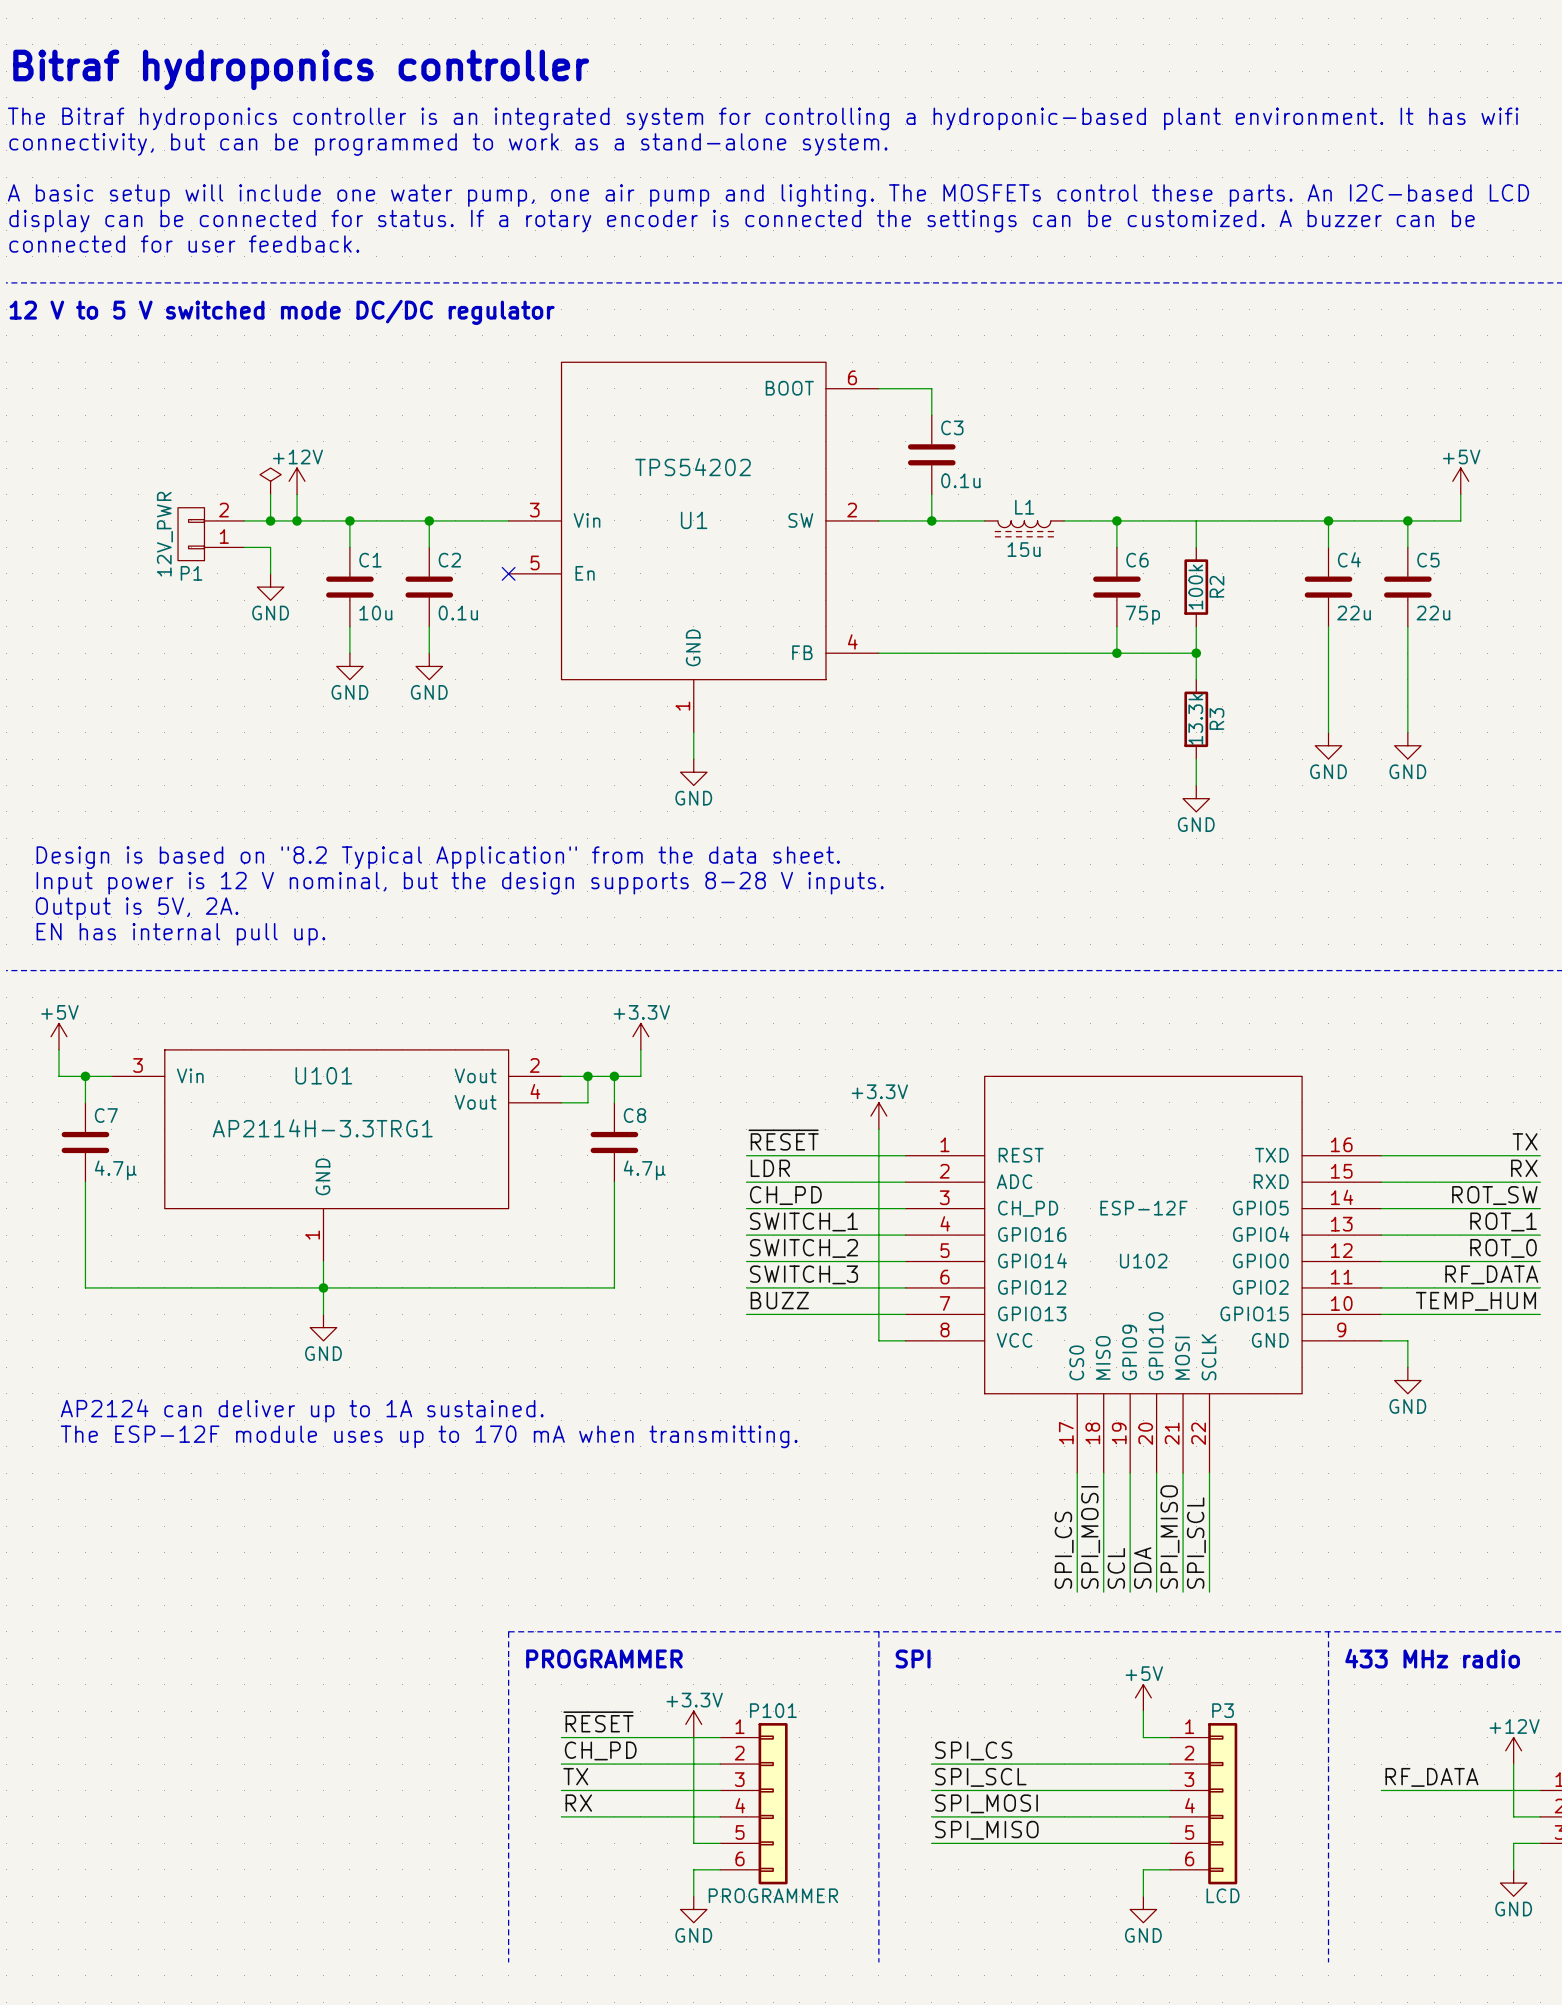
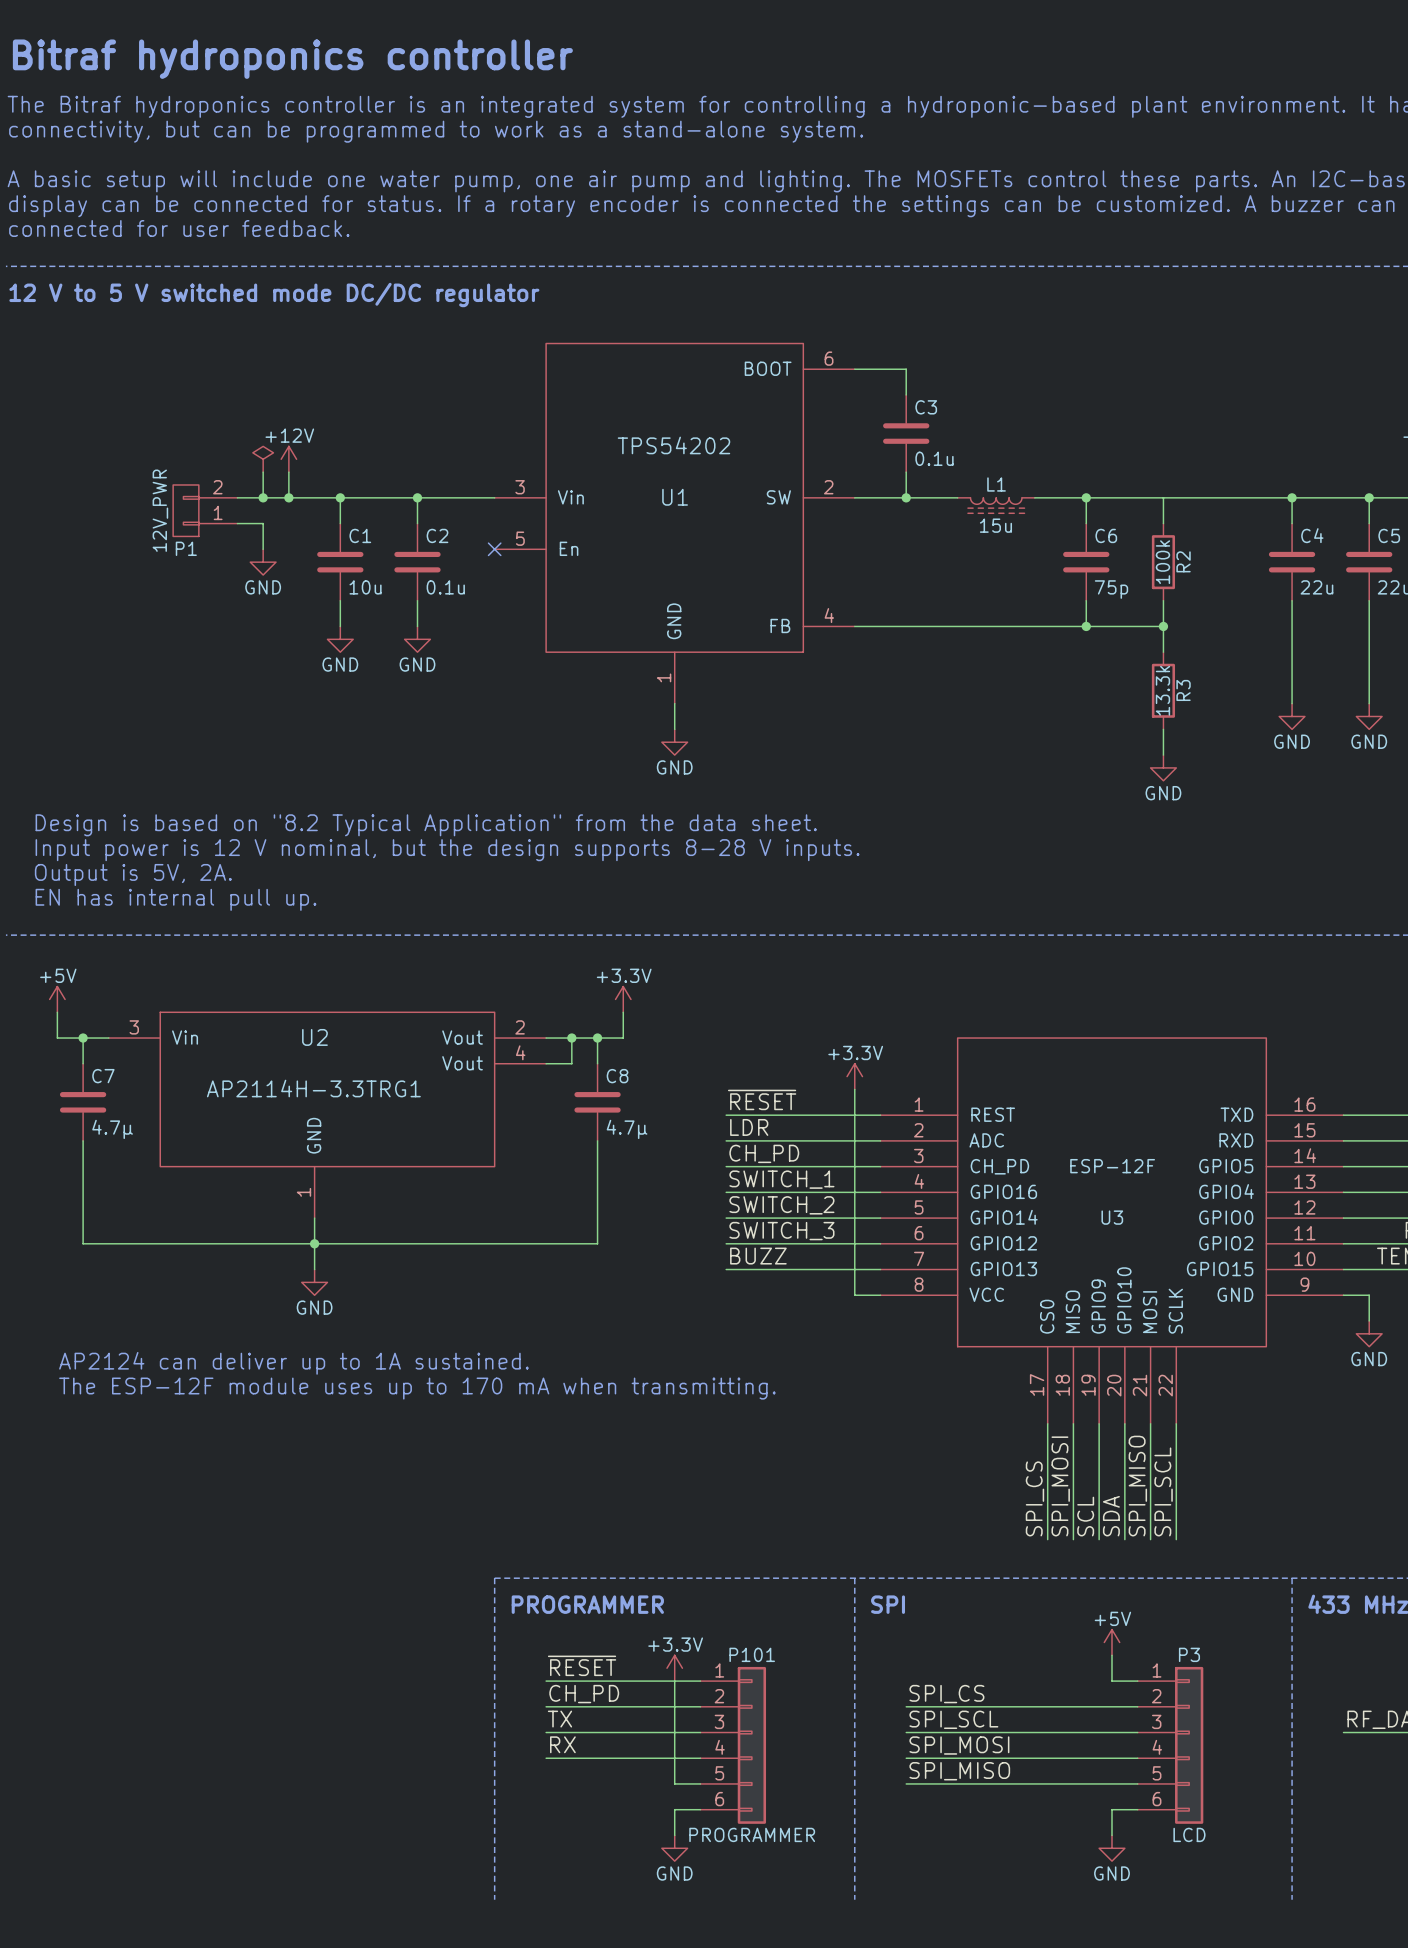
U101 name: U101 (323, 1075) -> U2 (314, 1037)
U102 name: U102 (1143, 1261) -> U3 (1112, 1217)

